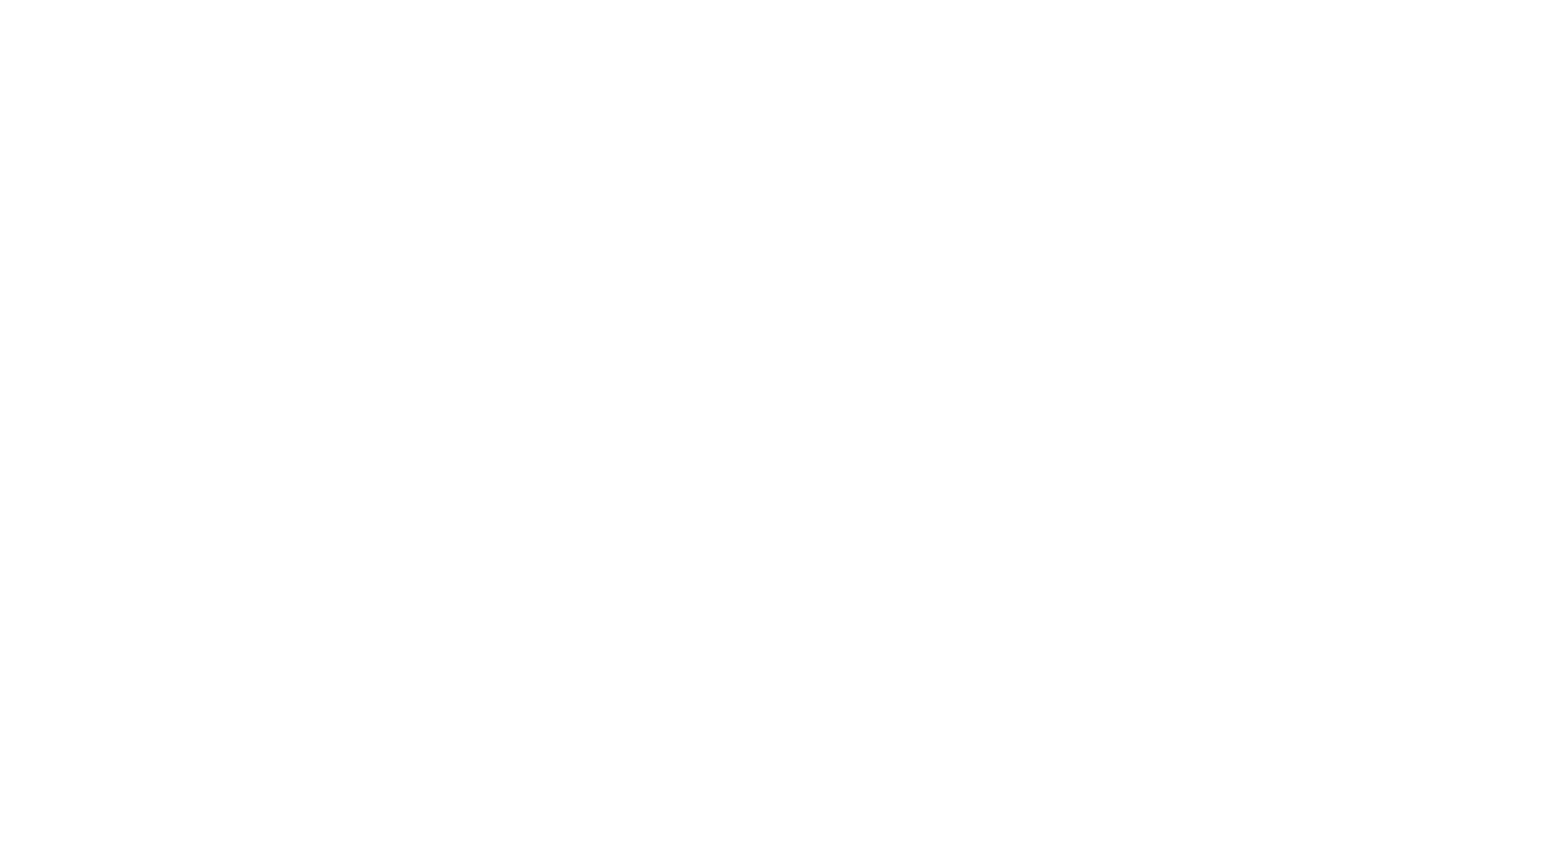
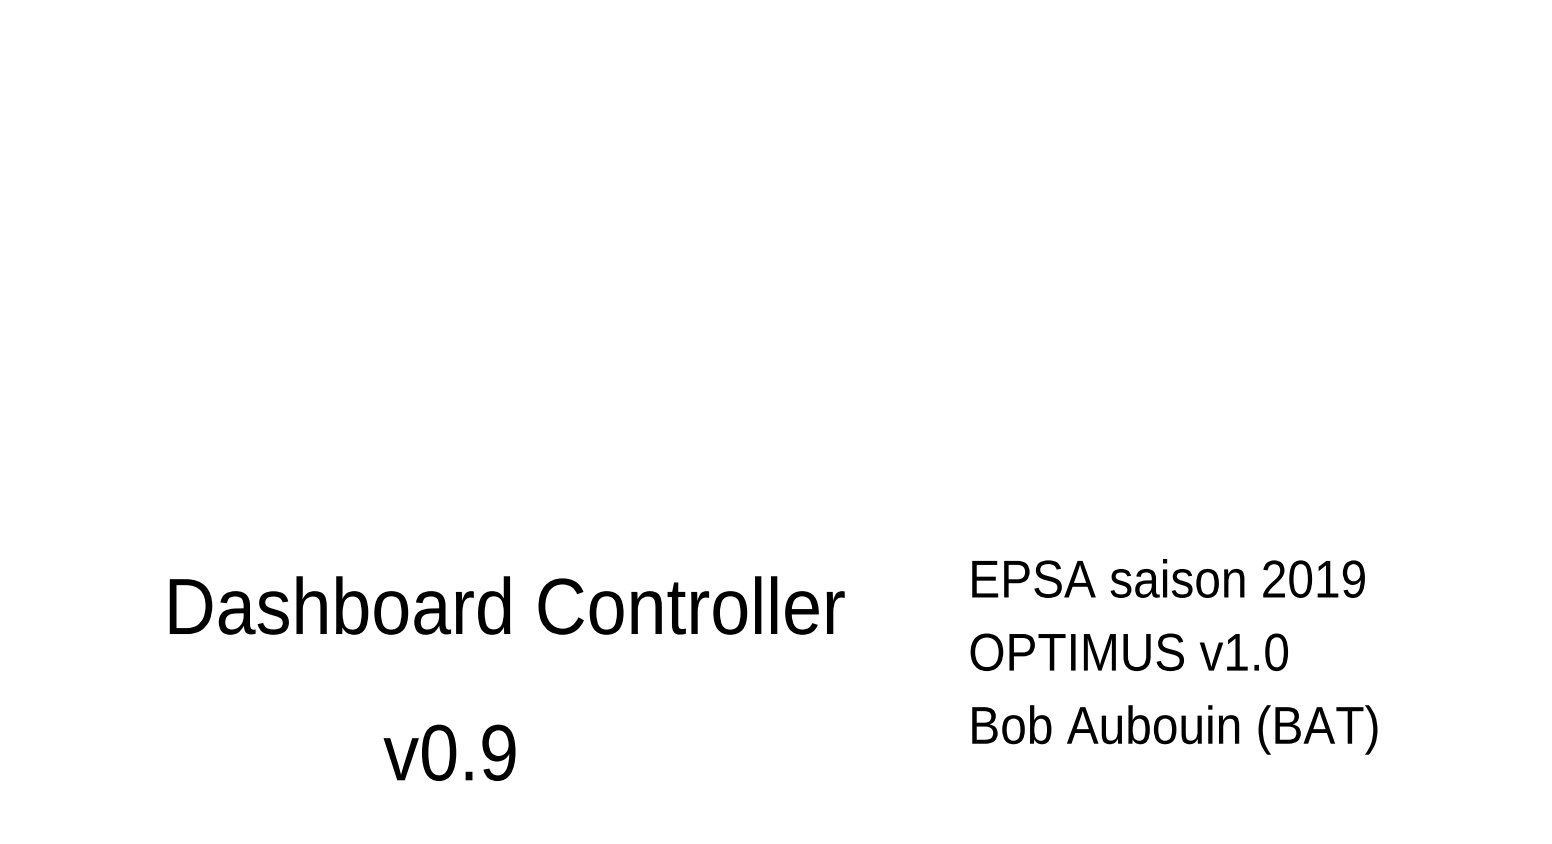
text: none -> EPSA saison 2019 (1168, 578)
text: none -> Dashboard Controller (507, 605)
text: none -> OPTIMUS v1.0 (1129, 652)
text: none -> Bob Aubouin (BAT) (1174, 729)
text: none -> v0.9 (449, 752)

